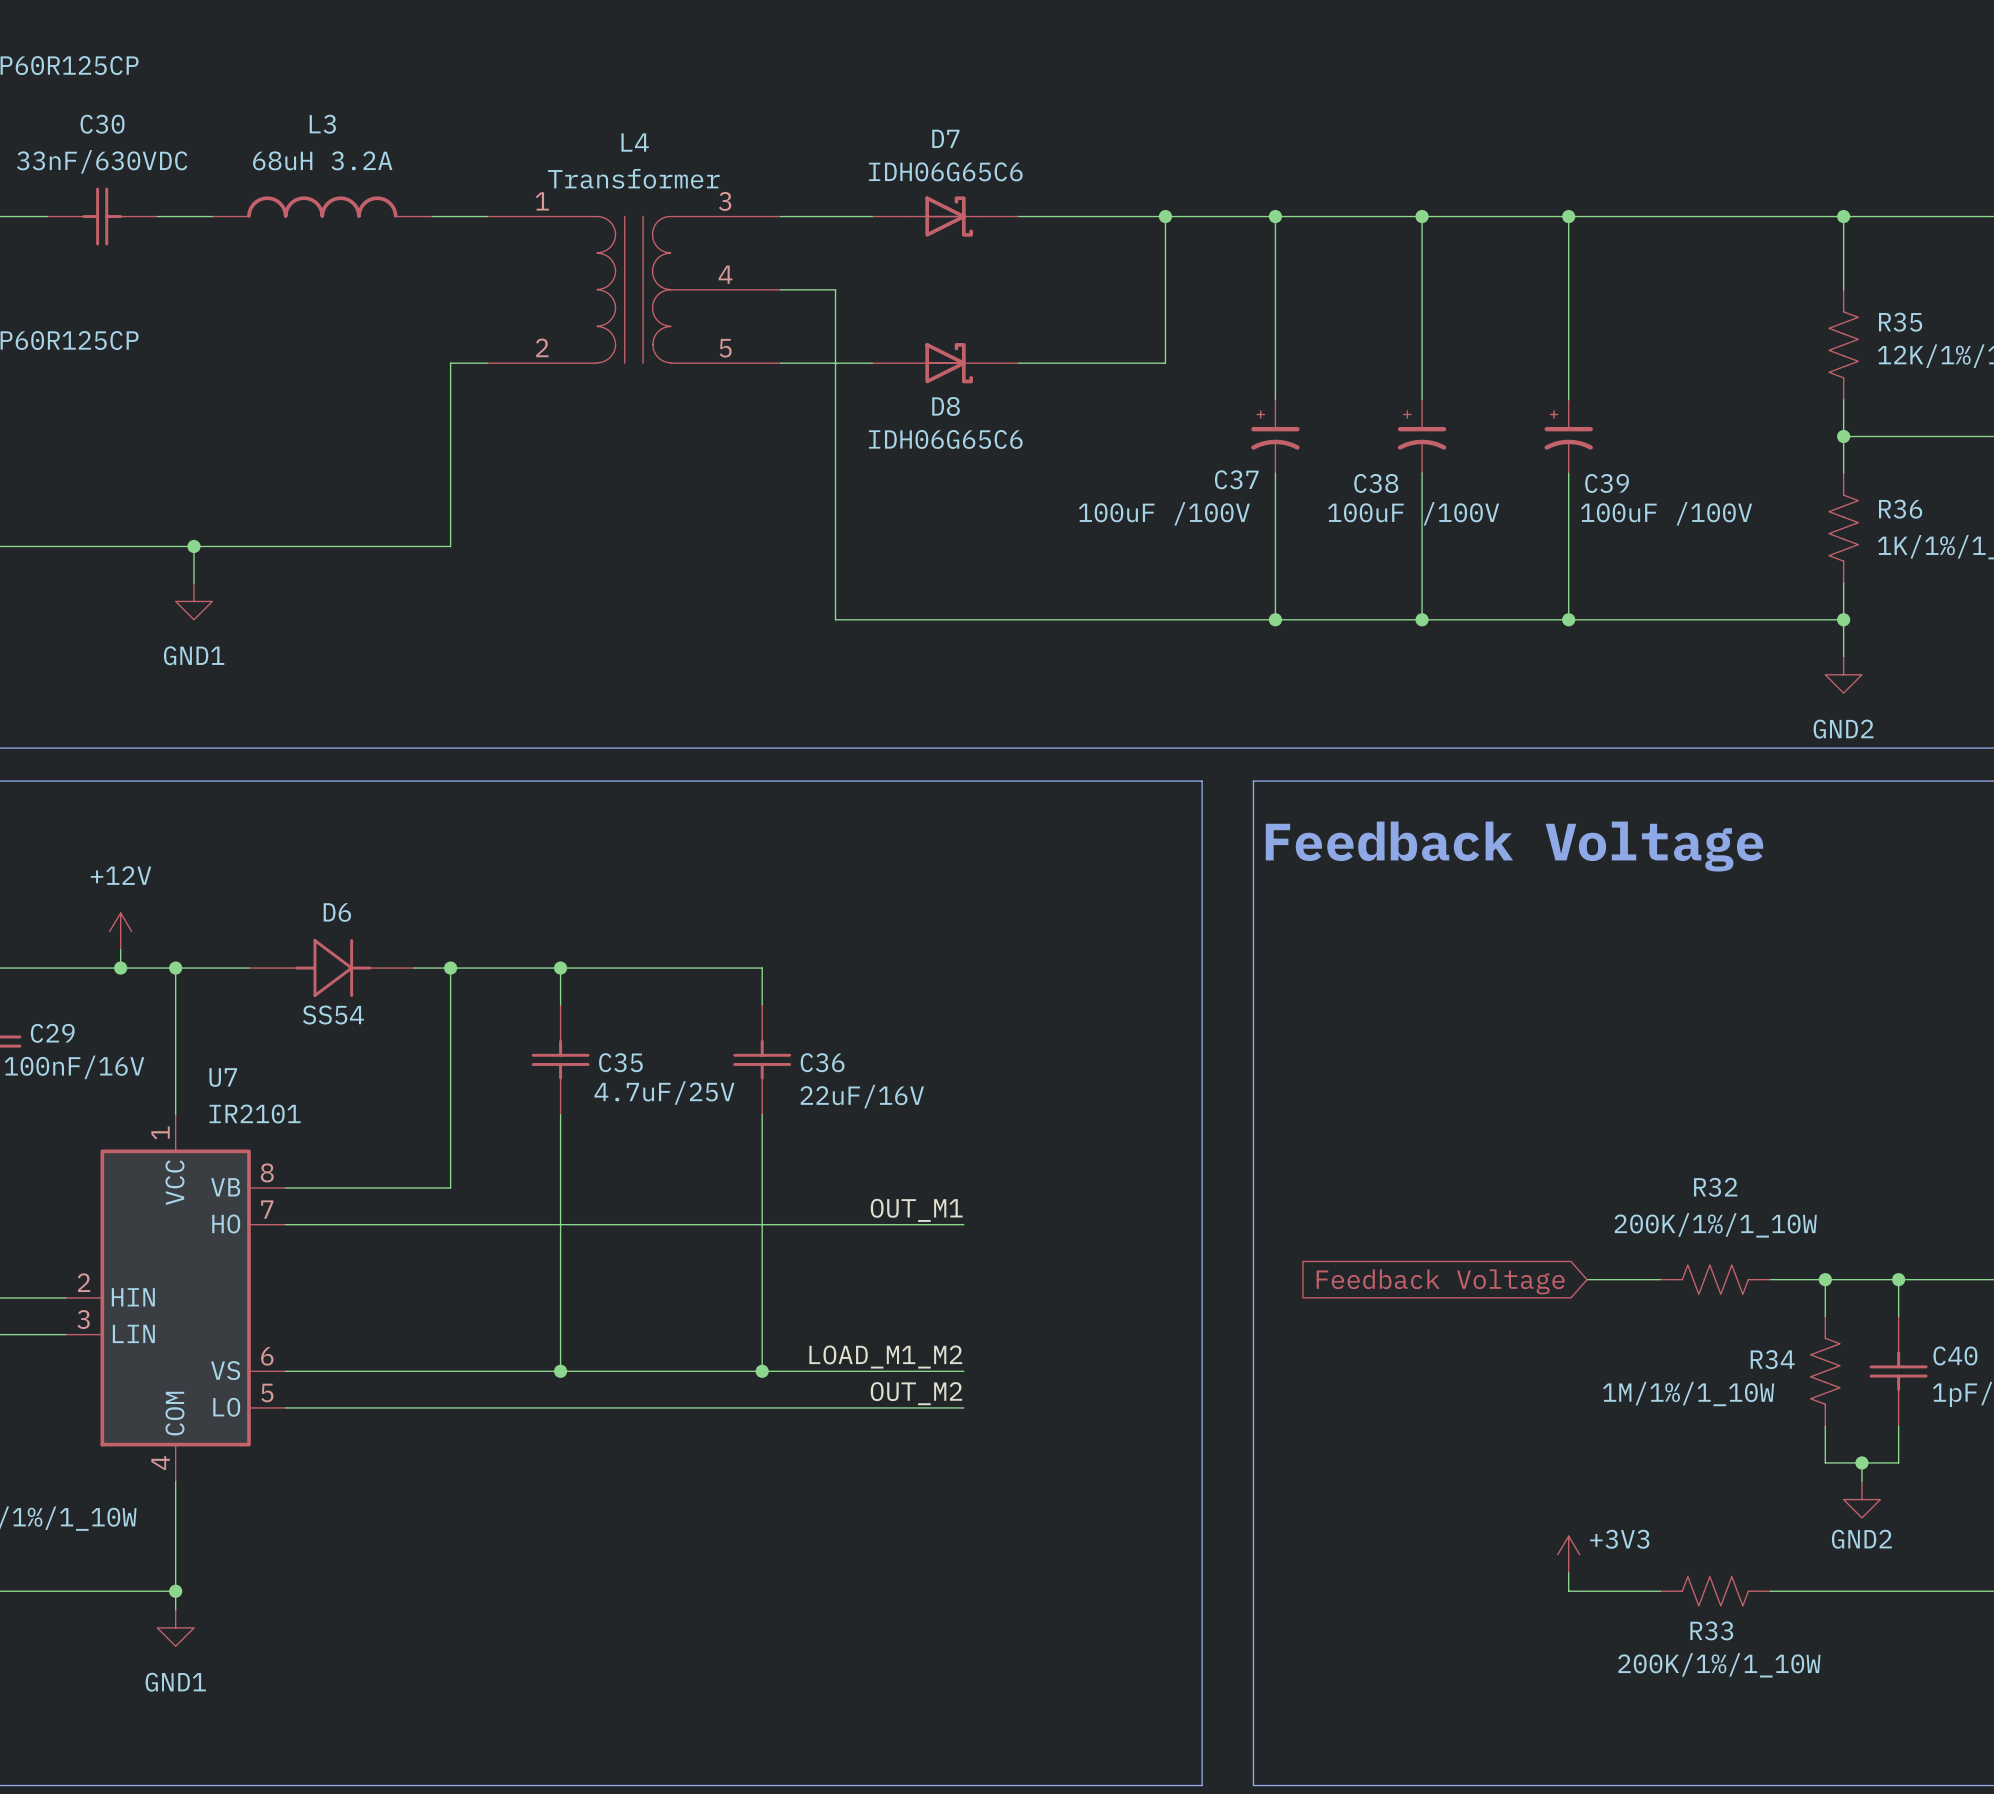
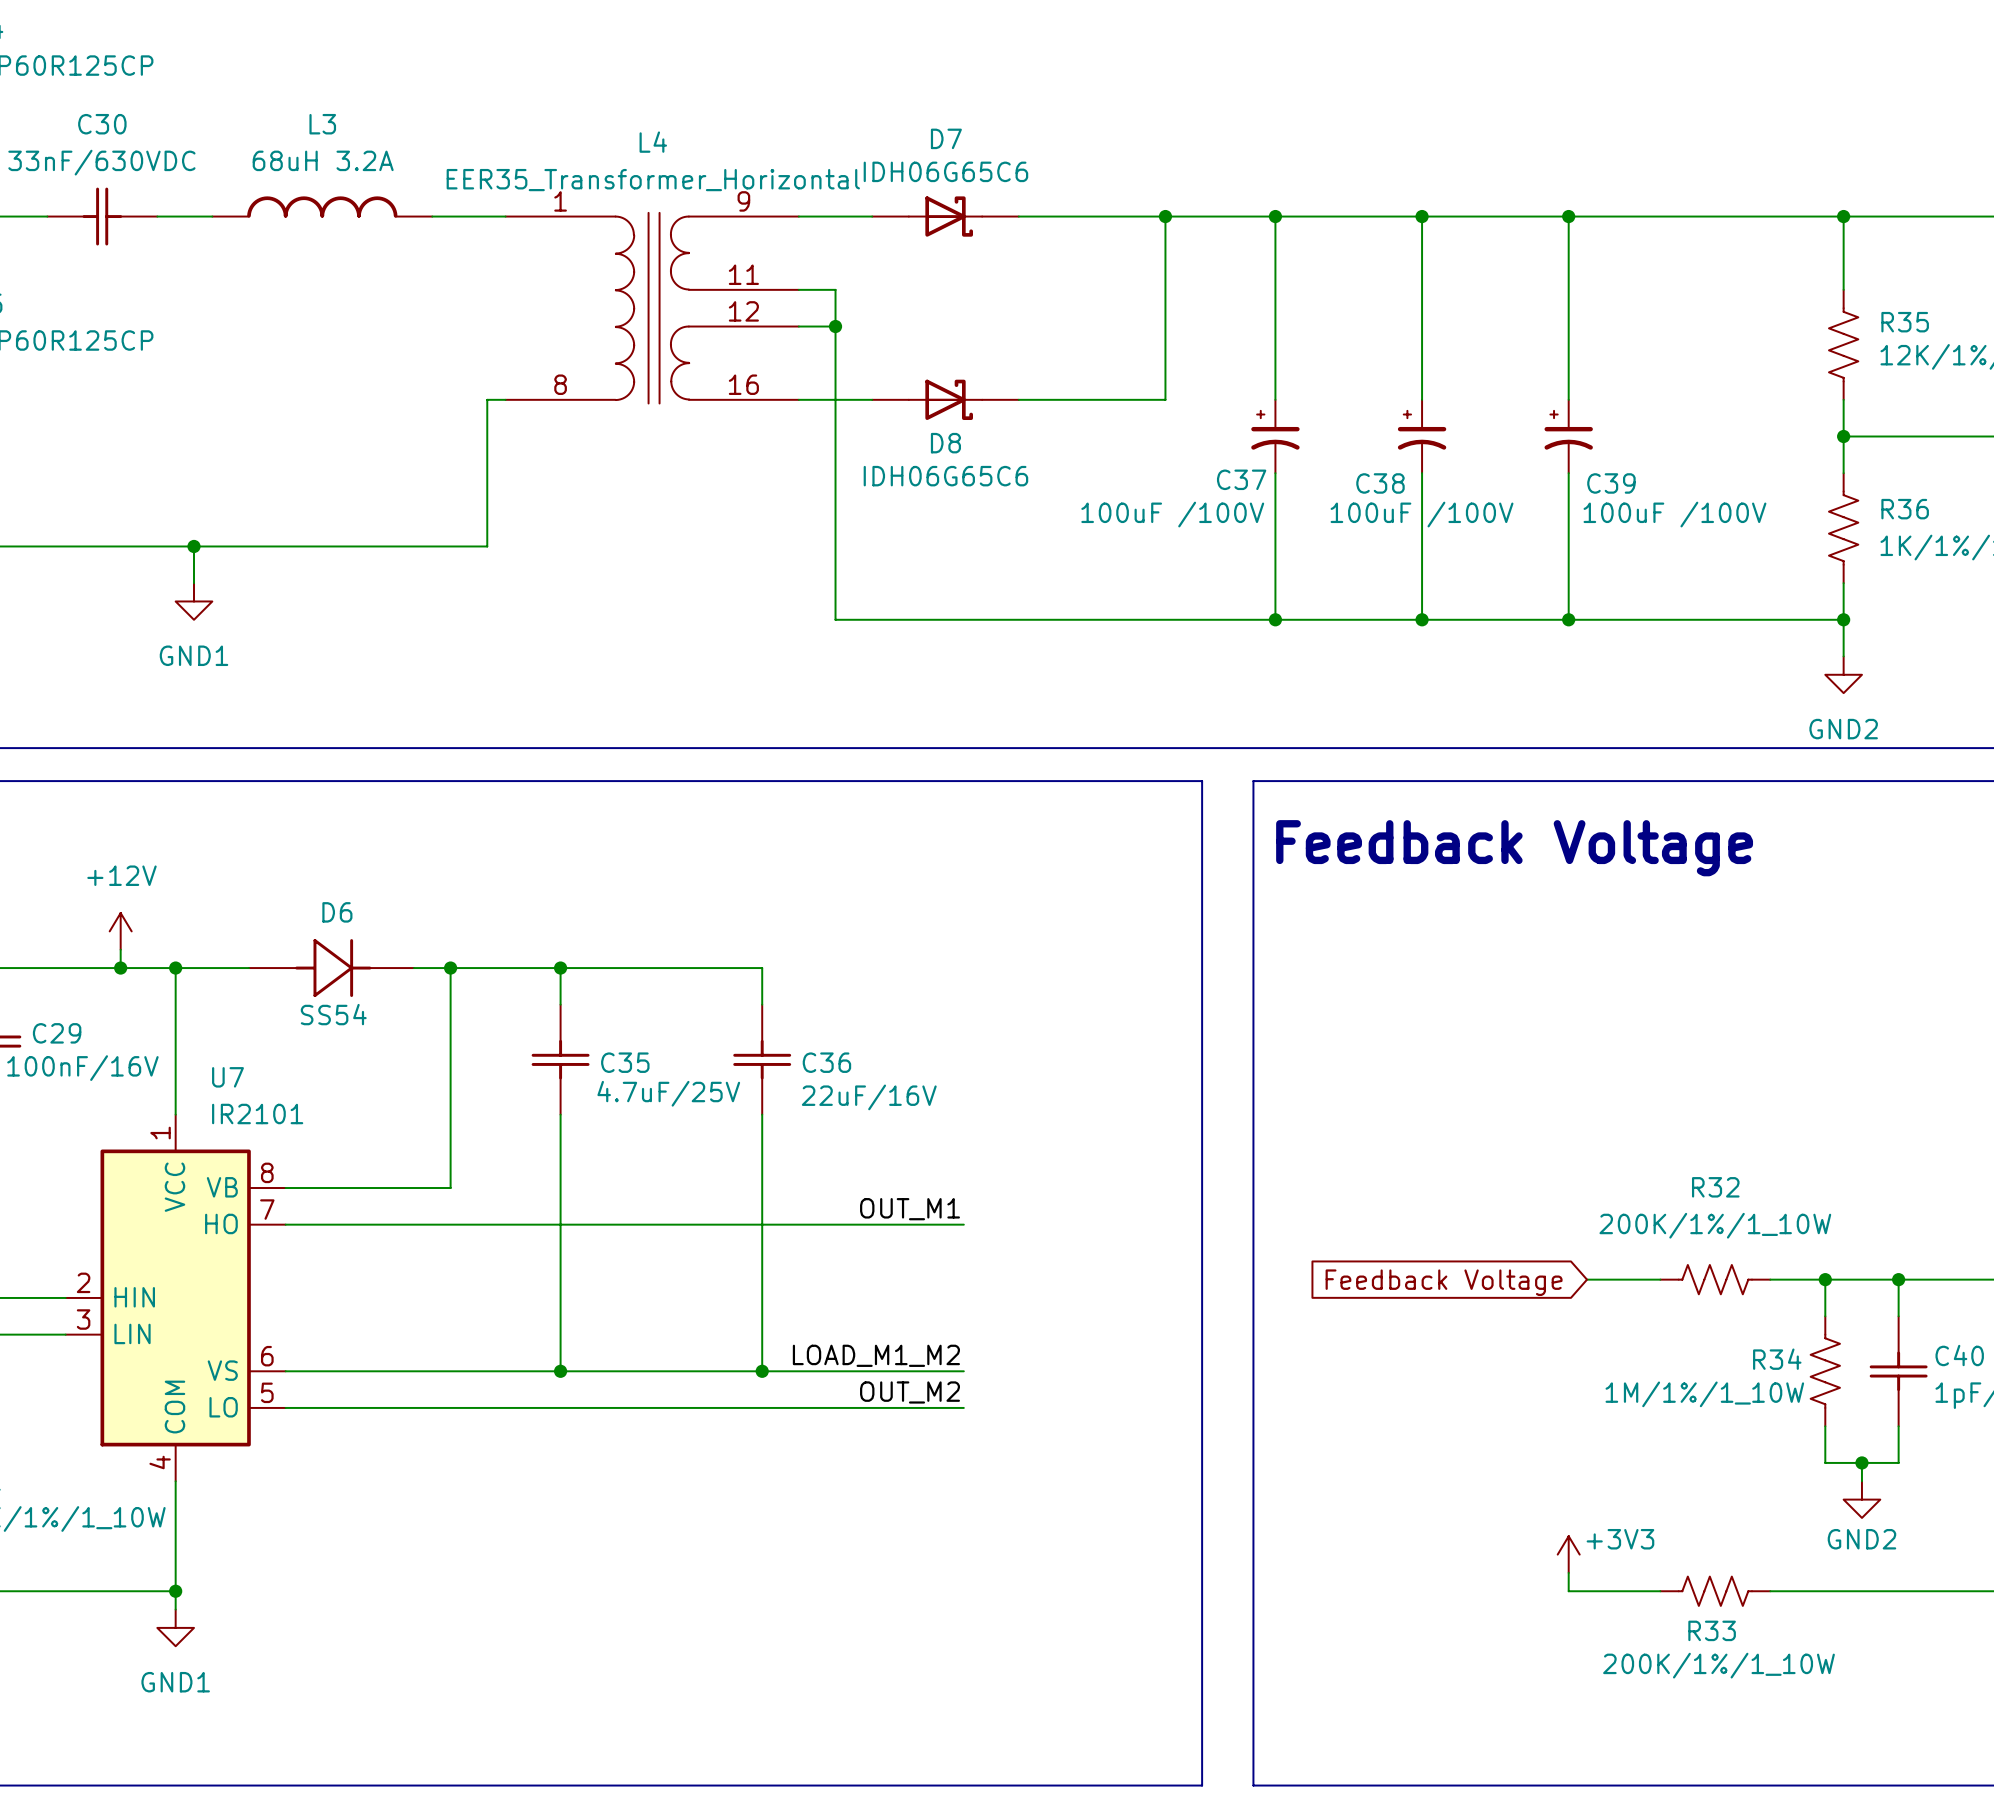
L4 value: Transformer (633, 178) -> EER35_Transformer_Horizontal (653, 180)
L4 symbol: [487, 216, 781, 364] -> [505, 212, 799, 404]
wire: none -> (798, 326) (835, 326)
junction: none -> (835, 326)
wire: (487, 363) (450, 363) (450, 546) -> (505, 399) (487, 399) (487, 546) (450, 546)
wire: (780, 363) (872, 363) -> none
D8 position: (945, 363) -> (945, 399)
wire: (1018, 363) (1165, 363) -> (1018, 399) (1165, 399) (1165, 363)
wire: none -> (798, 399) (872, 399)

